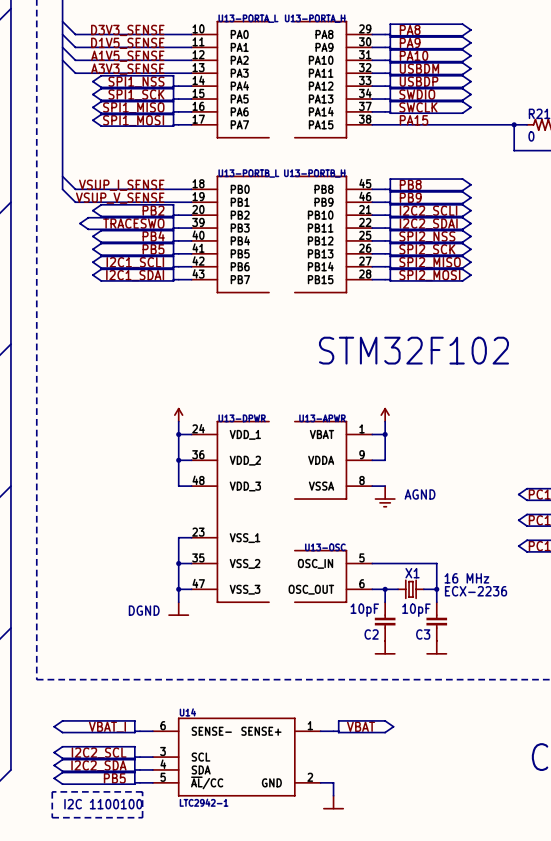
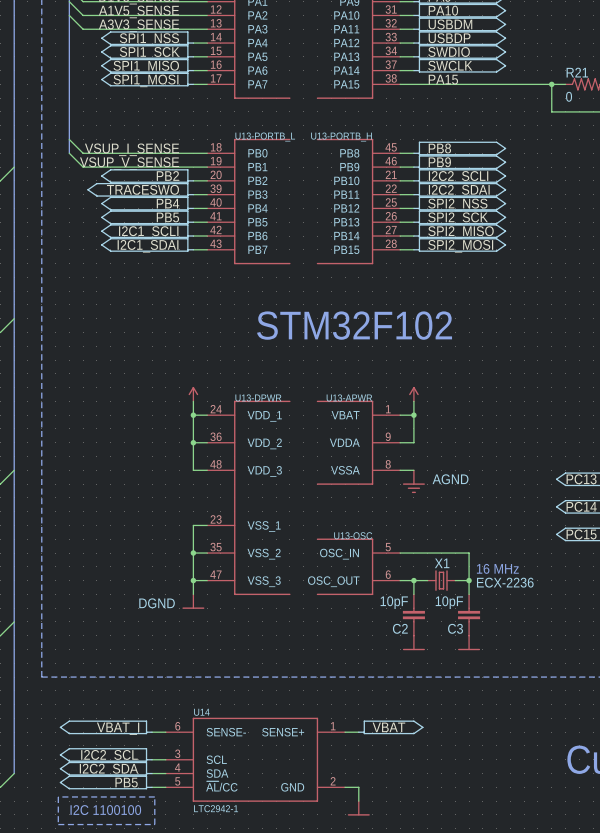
text position: STM32F102 (413, 350) -> STM32F102 (354, 325)

